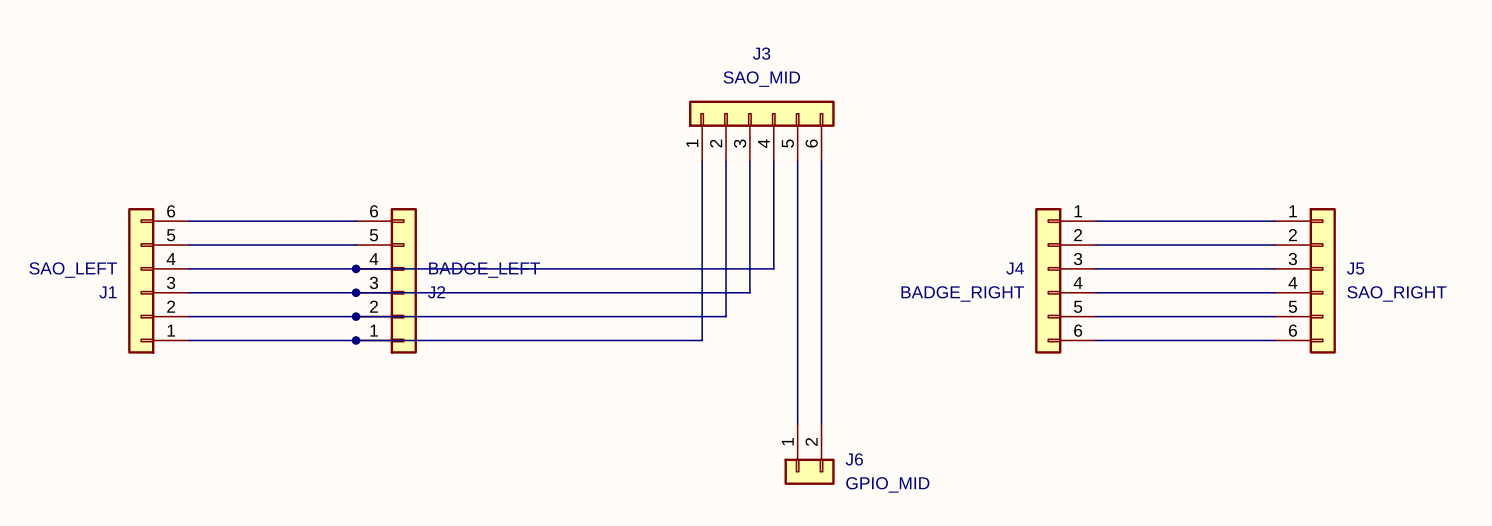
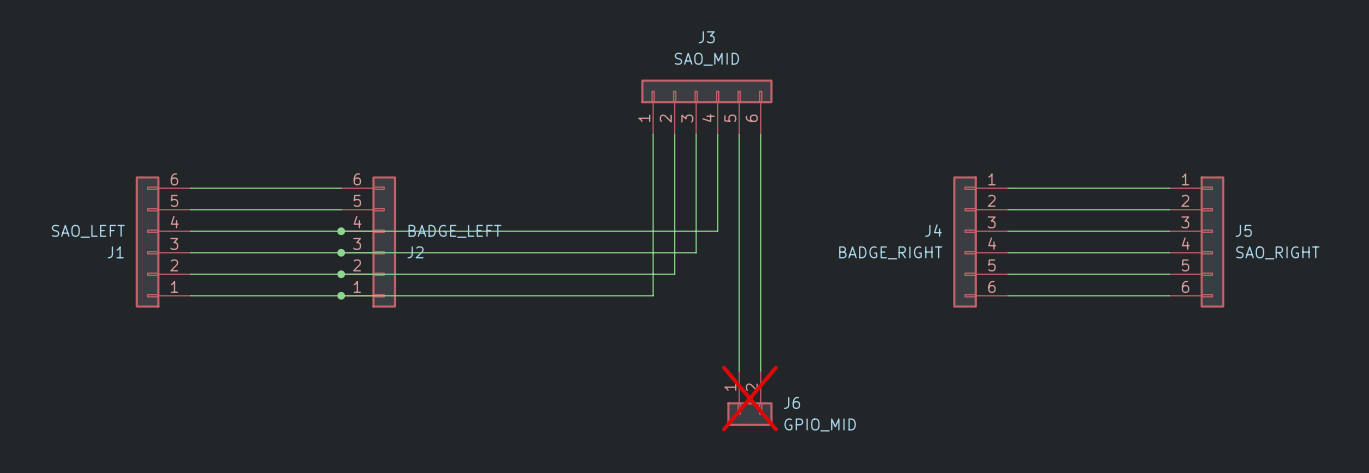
J6 do-not-place cross: none -> (749, 398)

